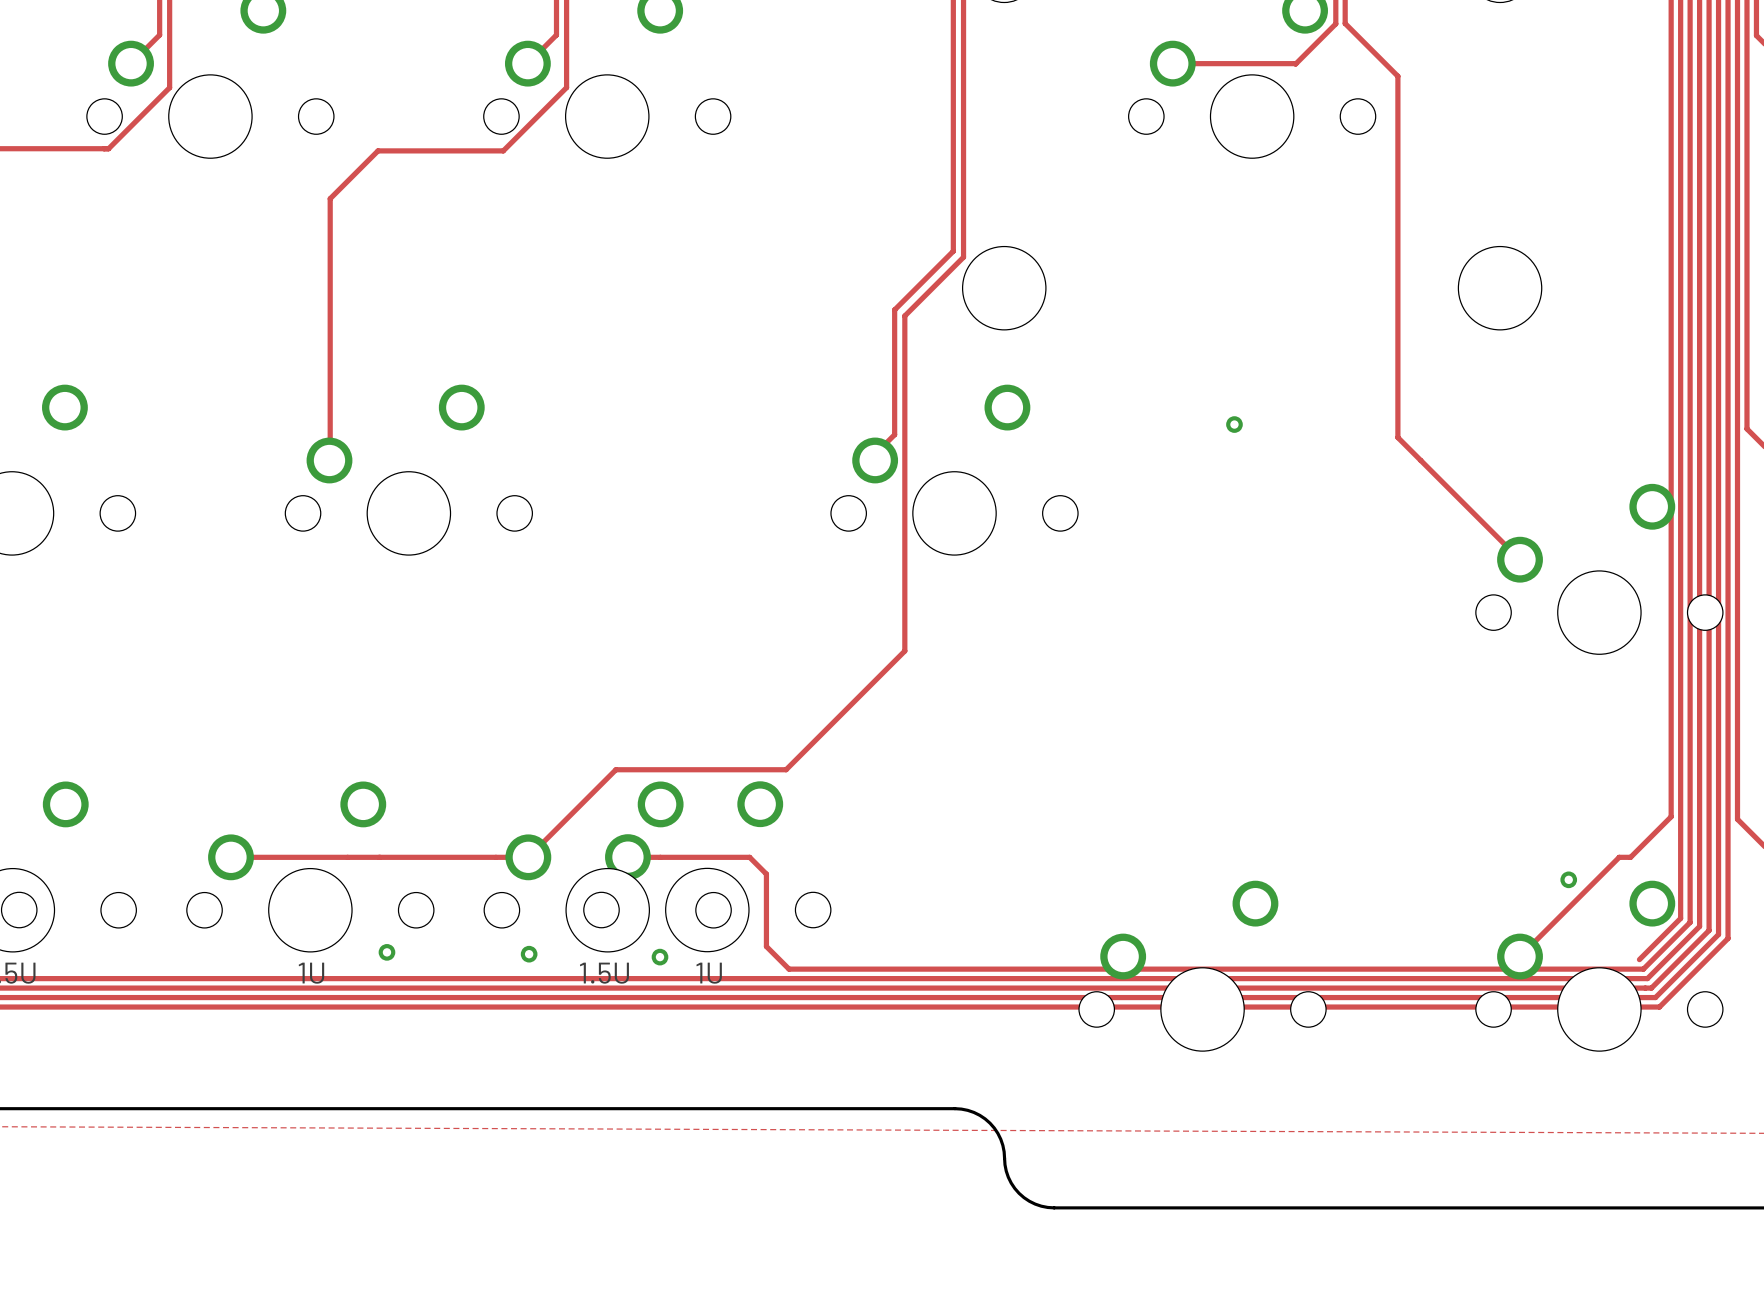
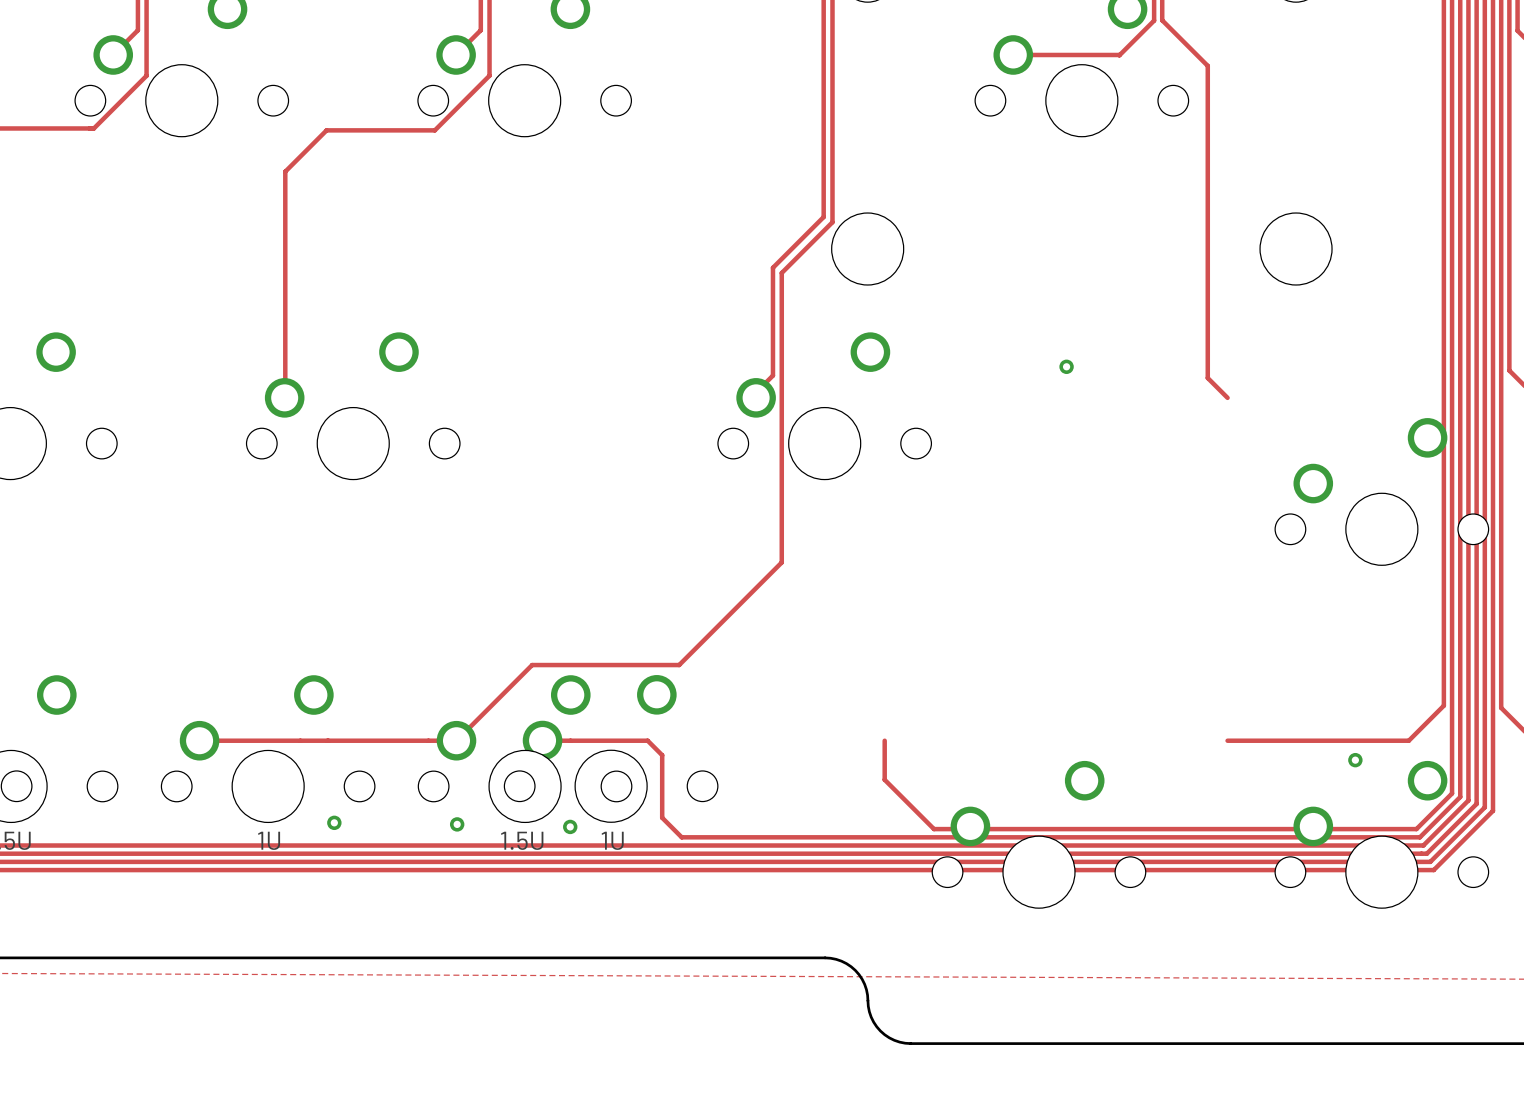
track: (1420, 460) (1520, 559) -> none
track: none -> (884, 740) (884, 779) (933, 829) (1416, 829)
track: (1619, 857) (1526, 950) (1520, 950) -> (1399, 740) (1227, 740)

